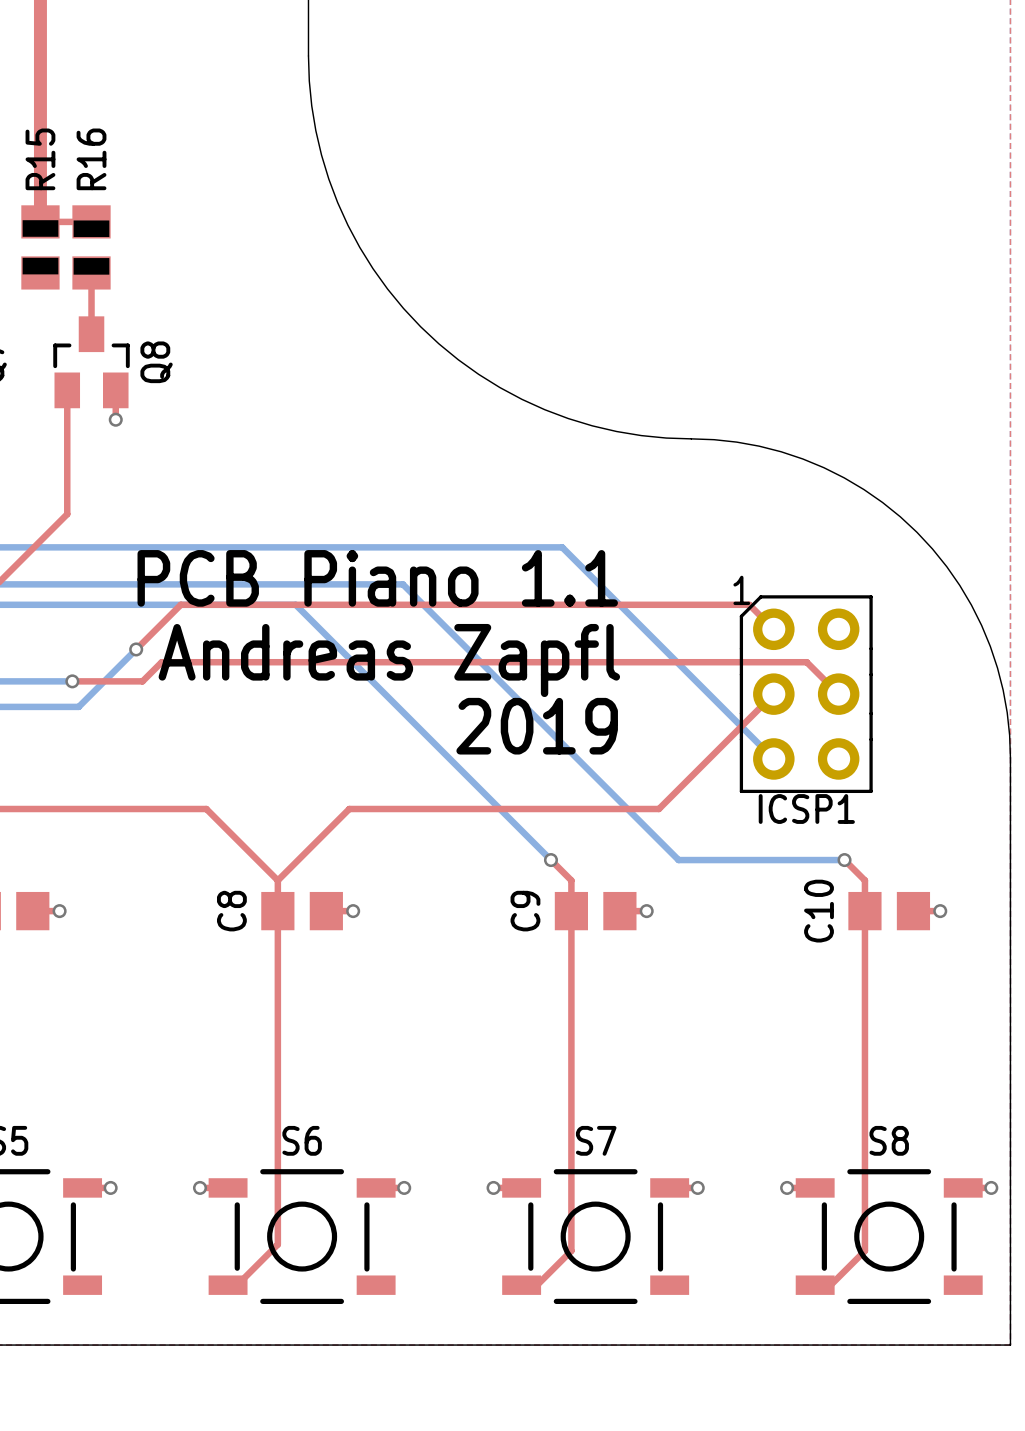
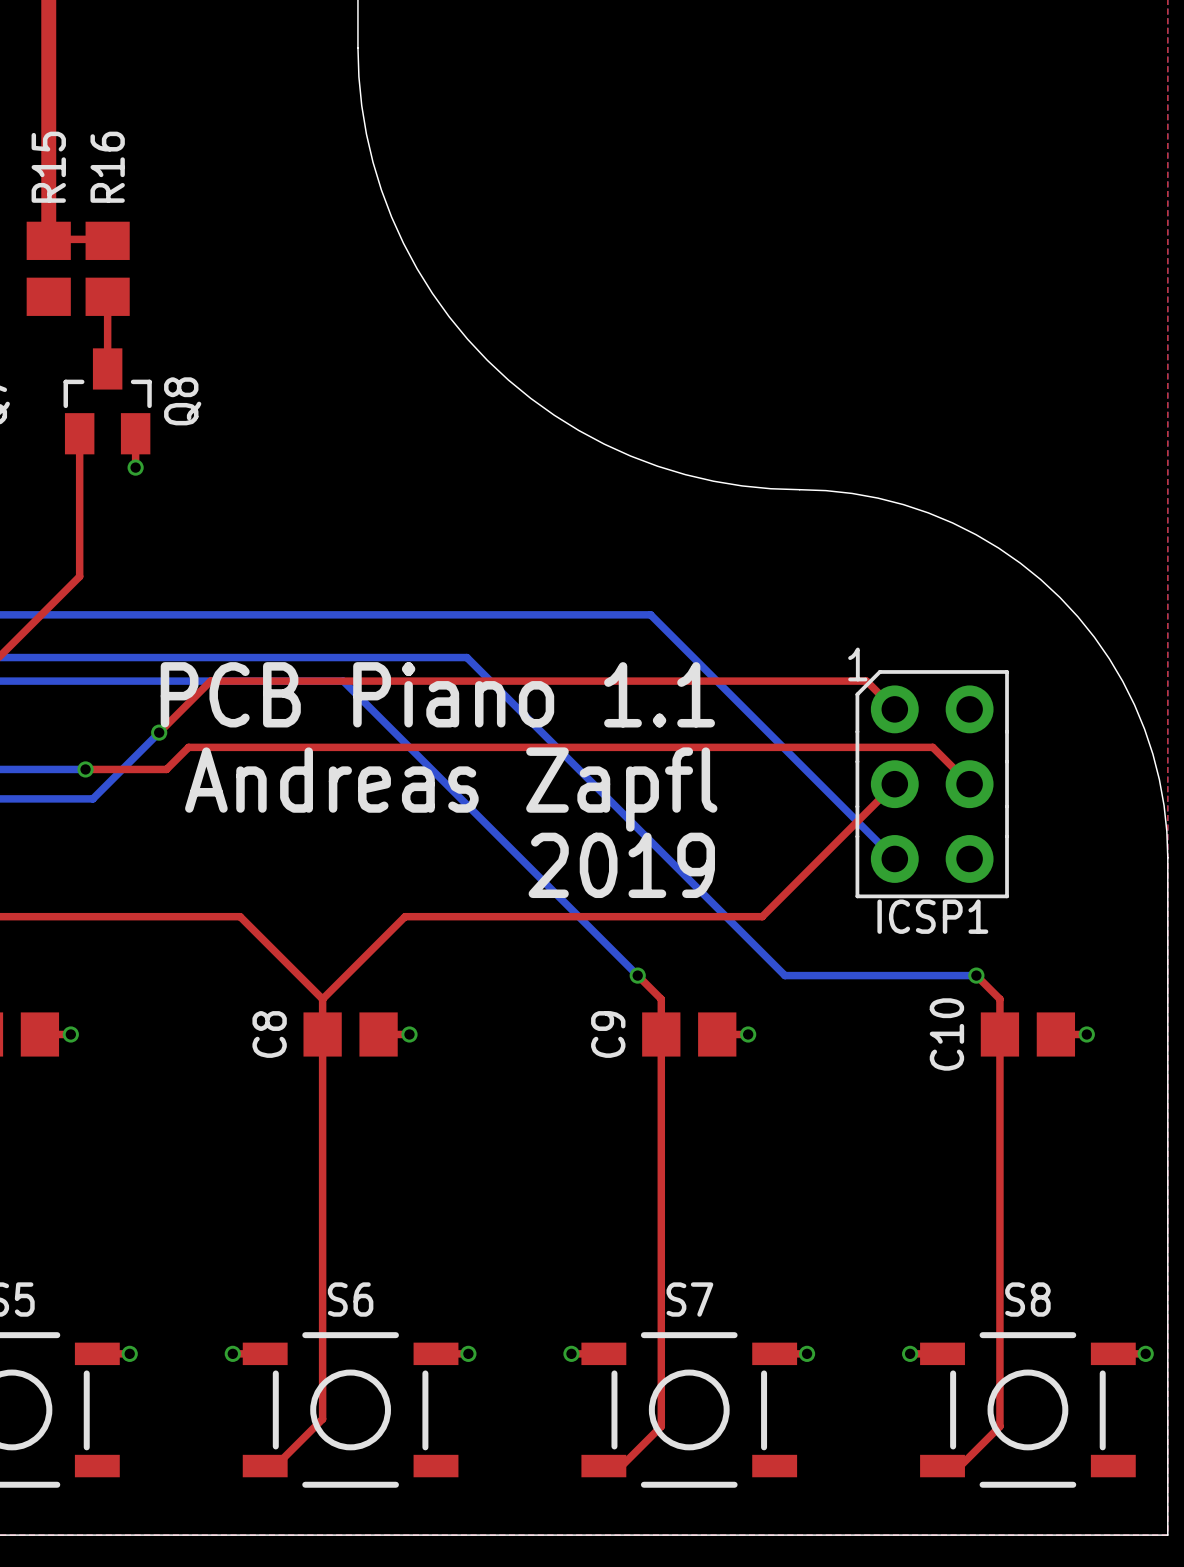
R15 footprint: [21, 205, 60, 290] -> [26, 221, 71, 316]
R16 footprint: [72, 205, 111, 290] -> [85, 221, 130, 316]
text position: PCB Piano 1.1 (377, 578) -> PCB Piano 1.1 (437, 694)
text position: Andreas Zapfl (389, 660) -> Andreas Zapfl (451, 789)
text position: 2019 (537, 726) -> 2019 (621, 865)

